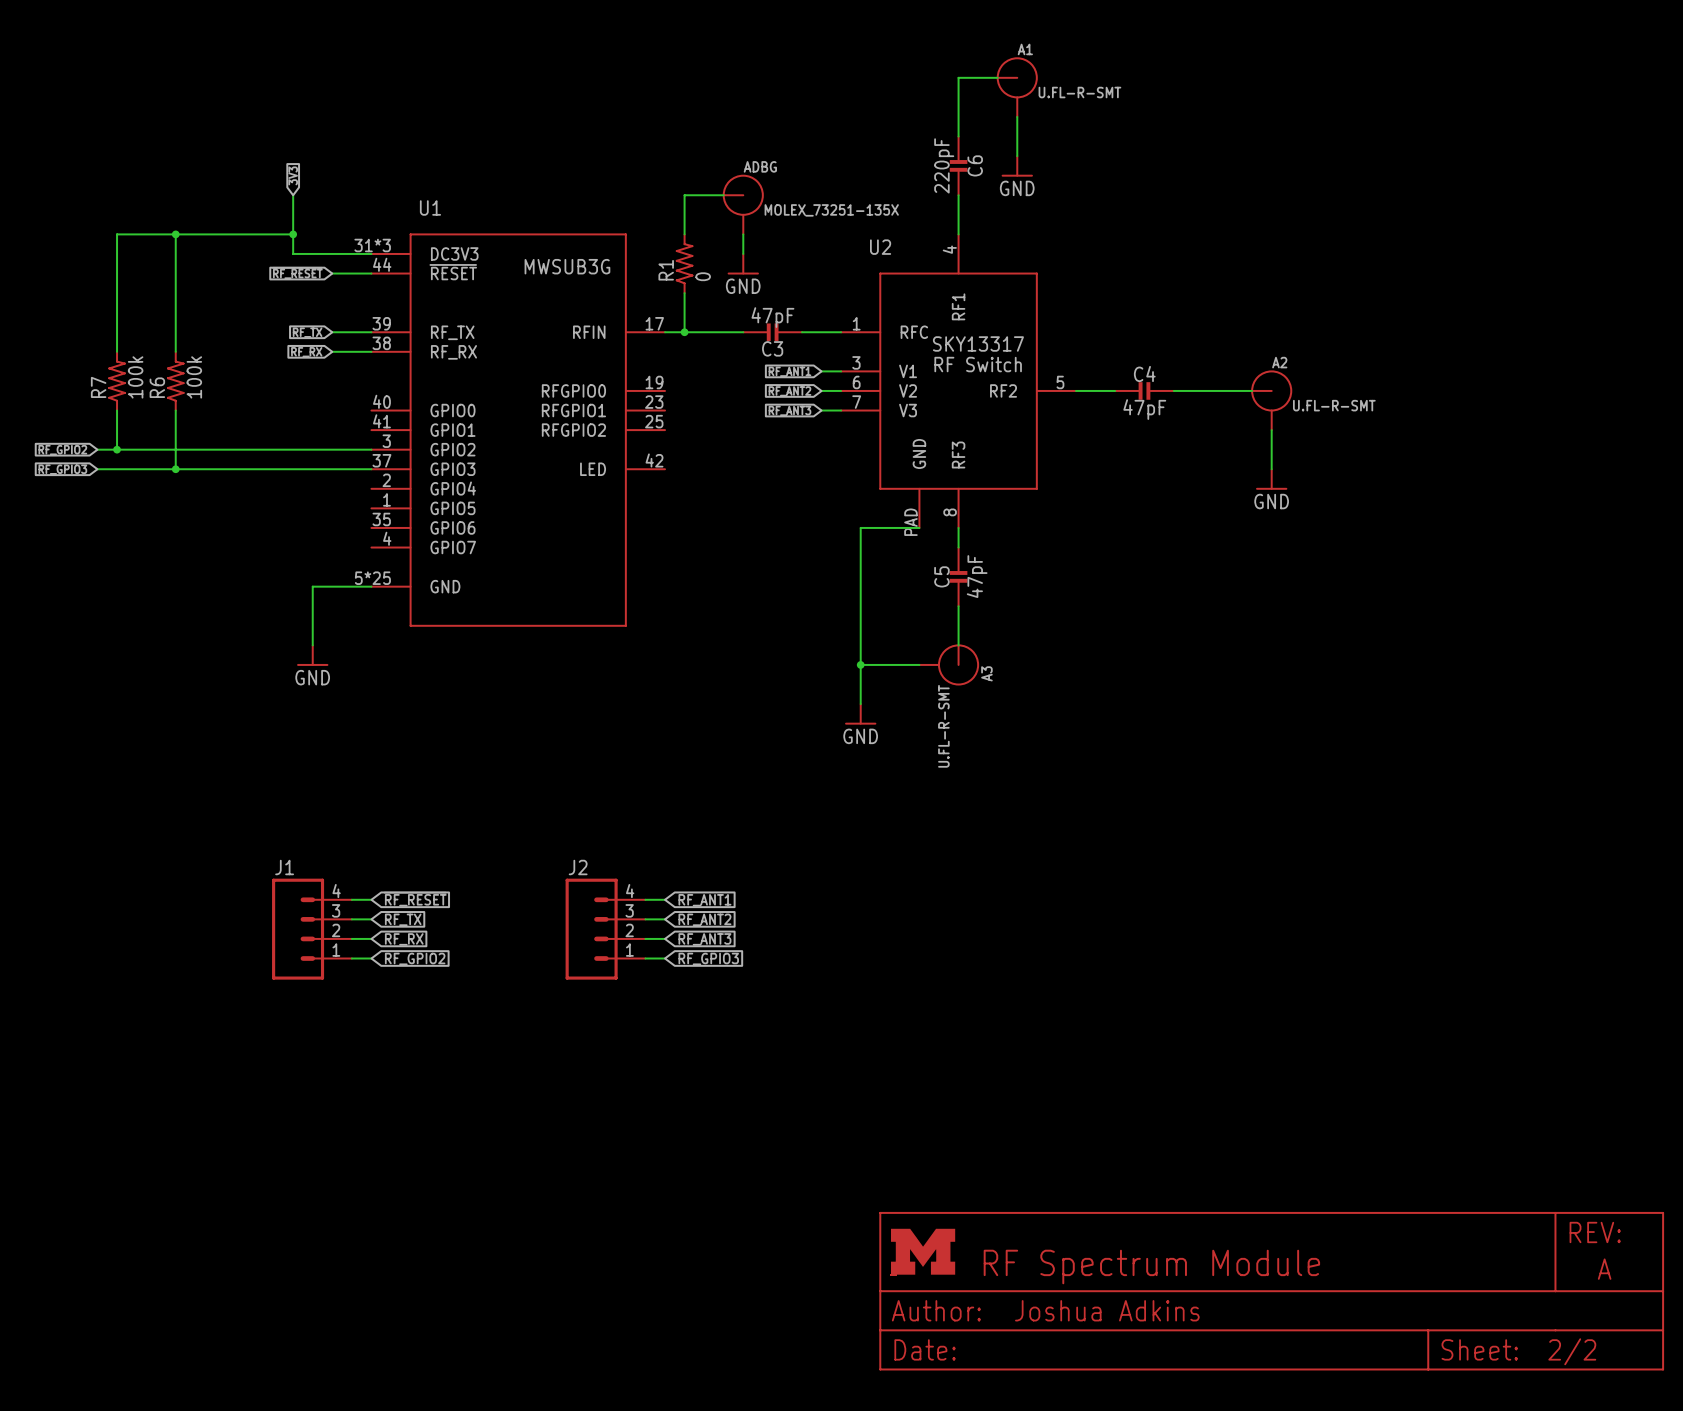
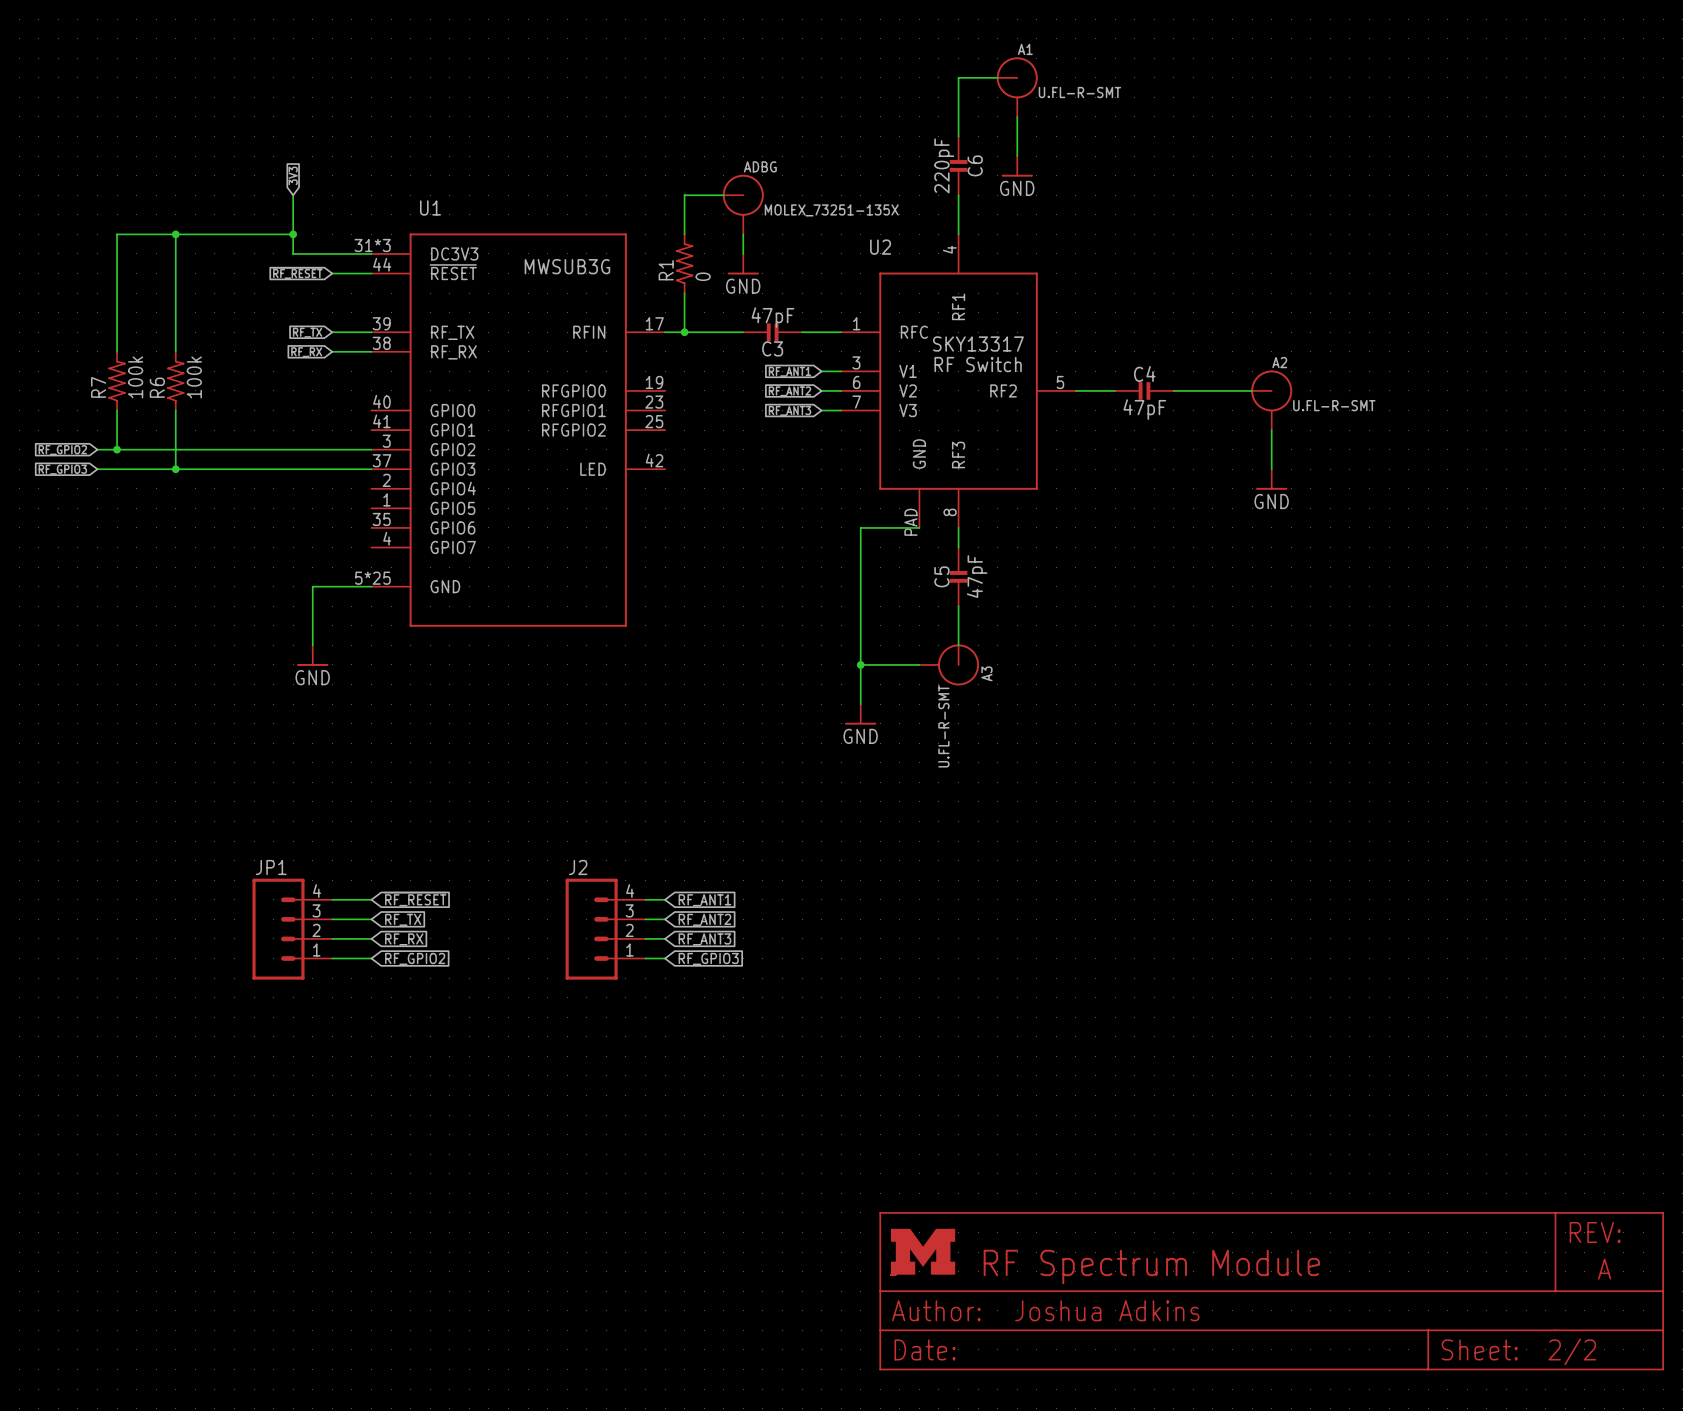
JP1: none -> (292, 929)
J1: (311, 929) -> none

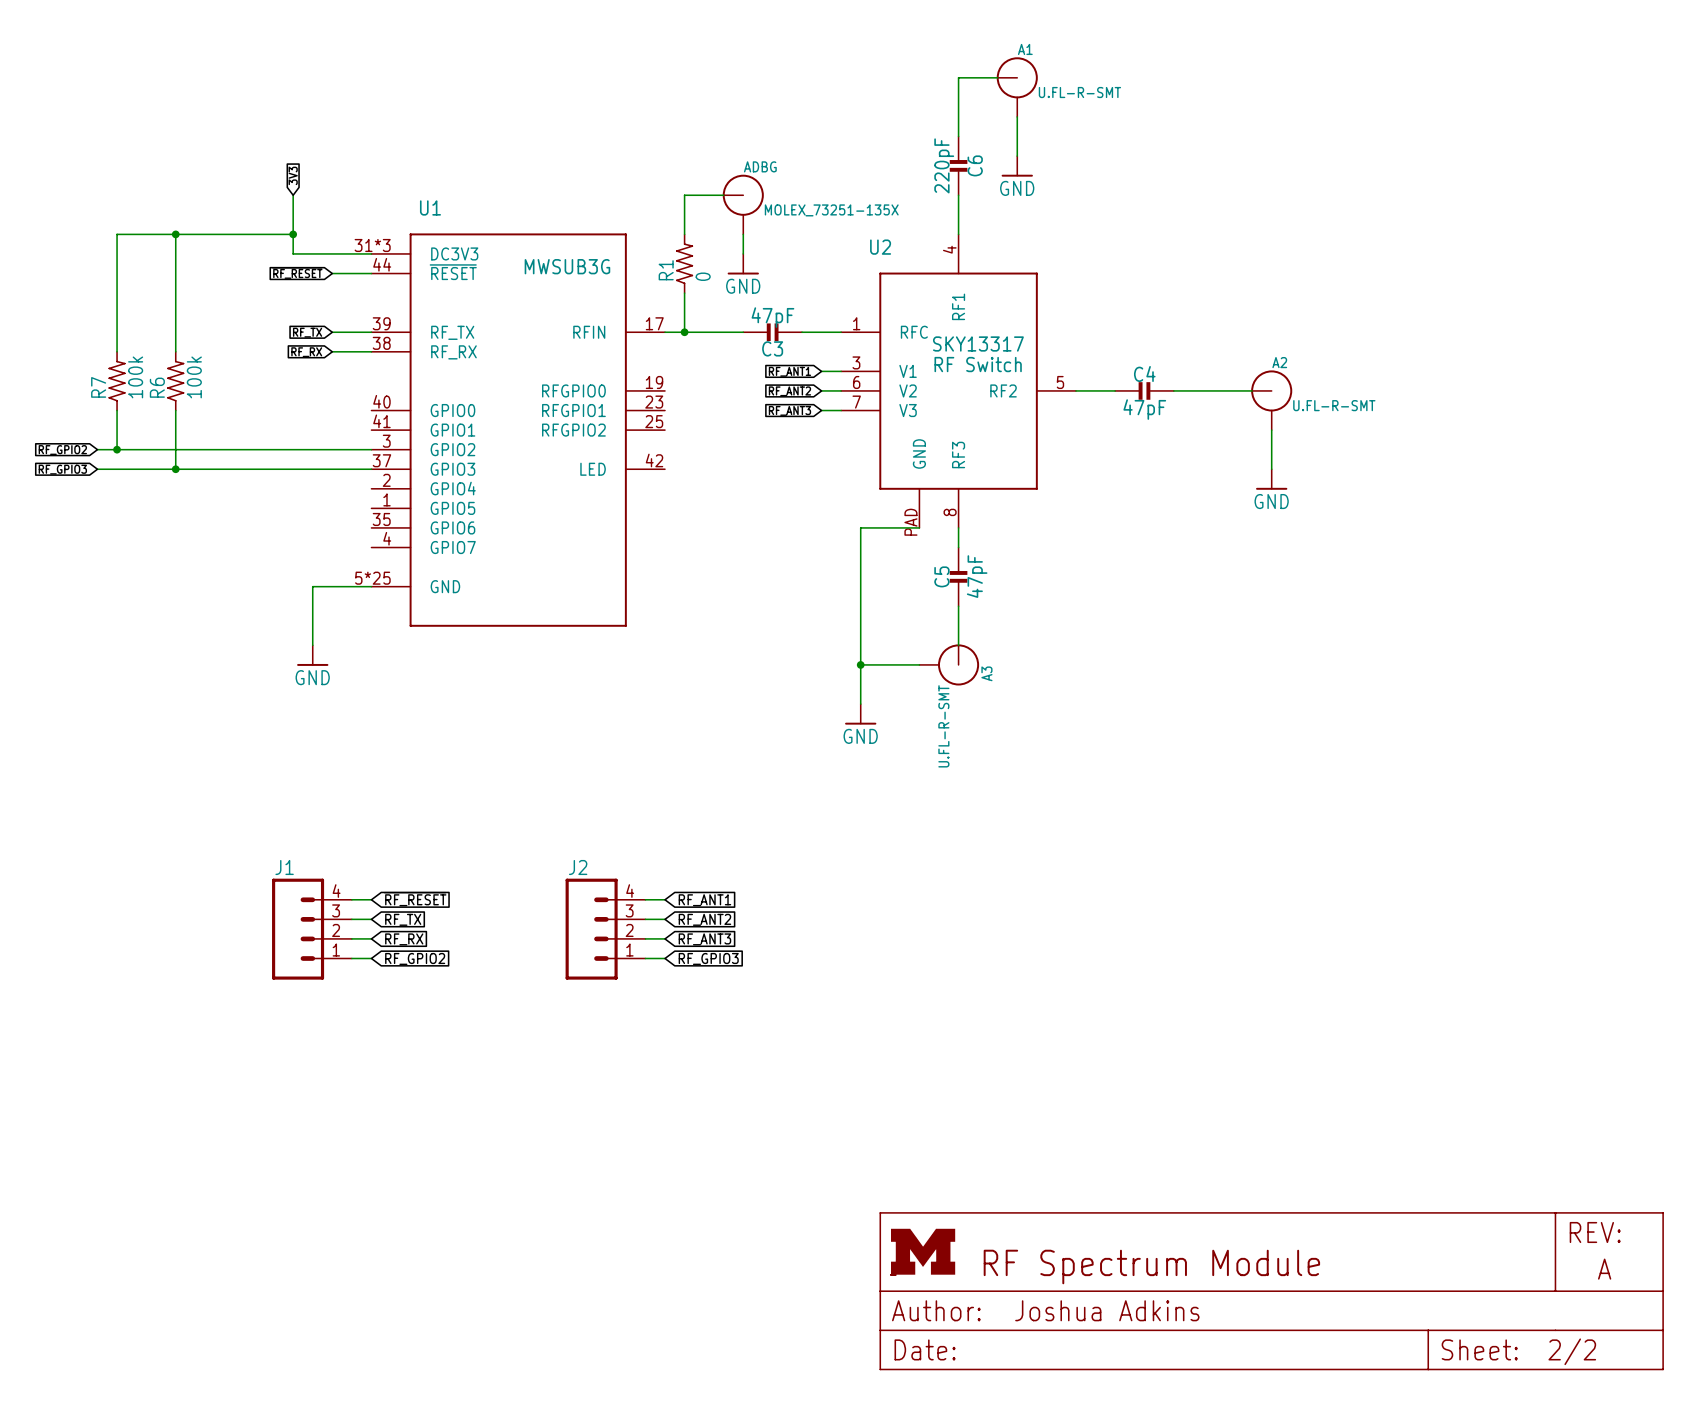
JP1: (292, 929) -> none
J1: none -> (311, 929)

